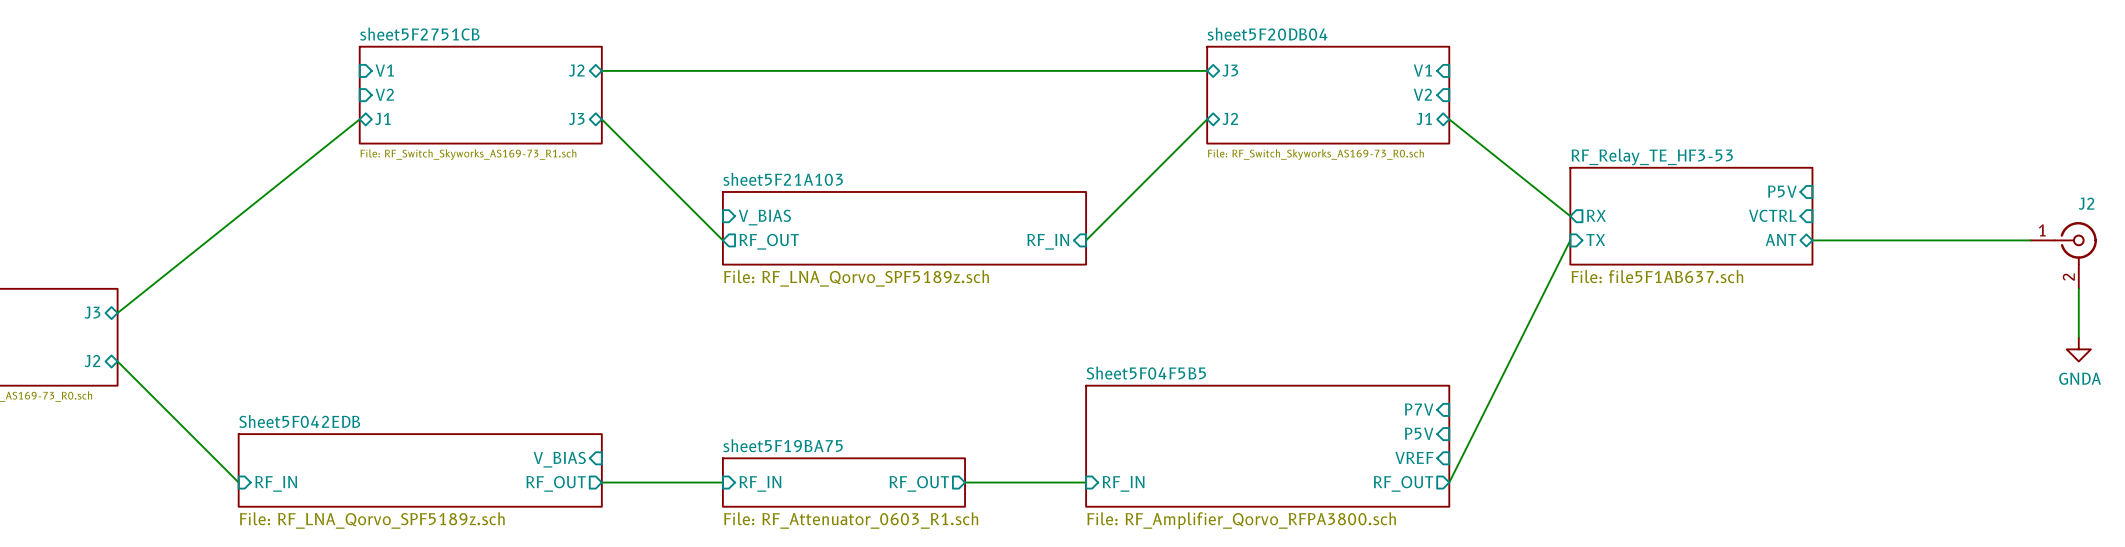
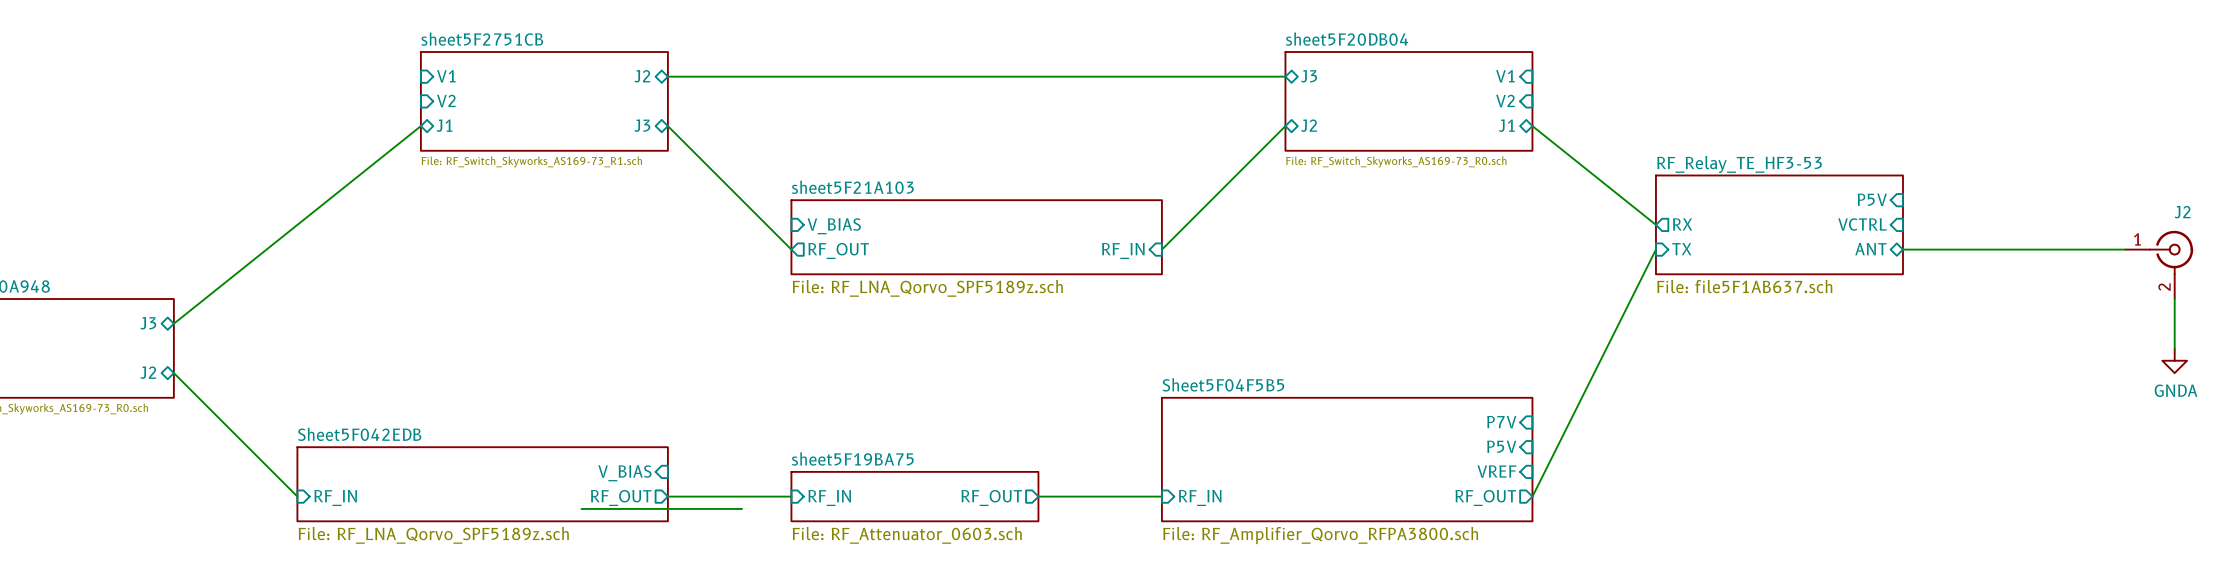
wire: none -> (581, 508) (742, 508)
sheet sheet5F19BA75 value: File: RF_Attenuator_0603_R1.sch (851, 520) -> File: RF_Attenuator_0603.sch (907, 535)

